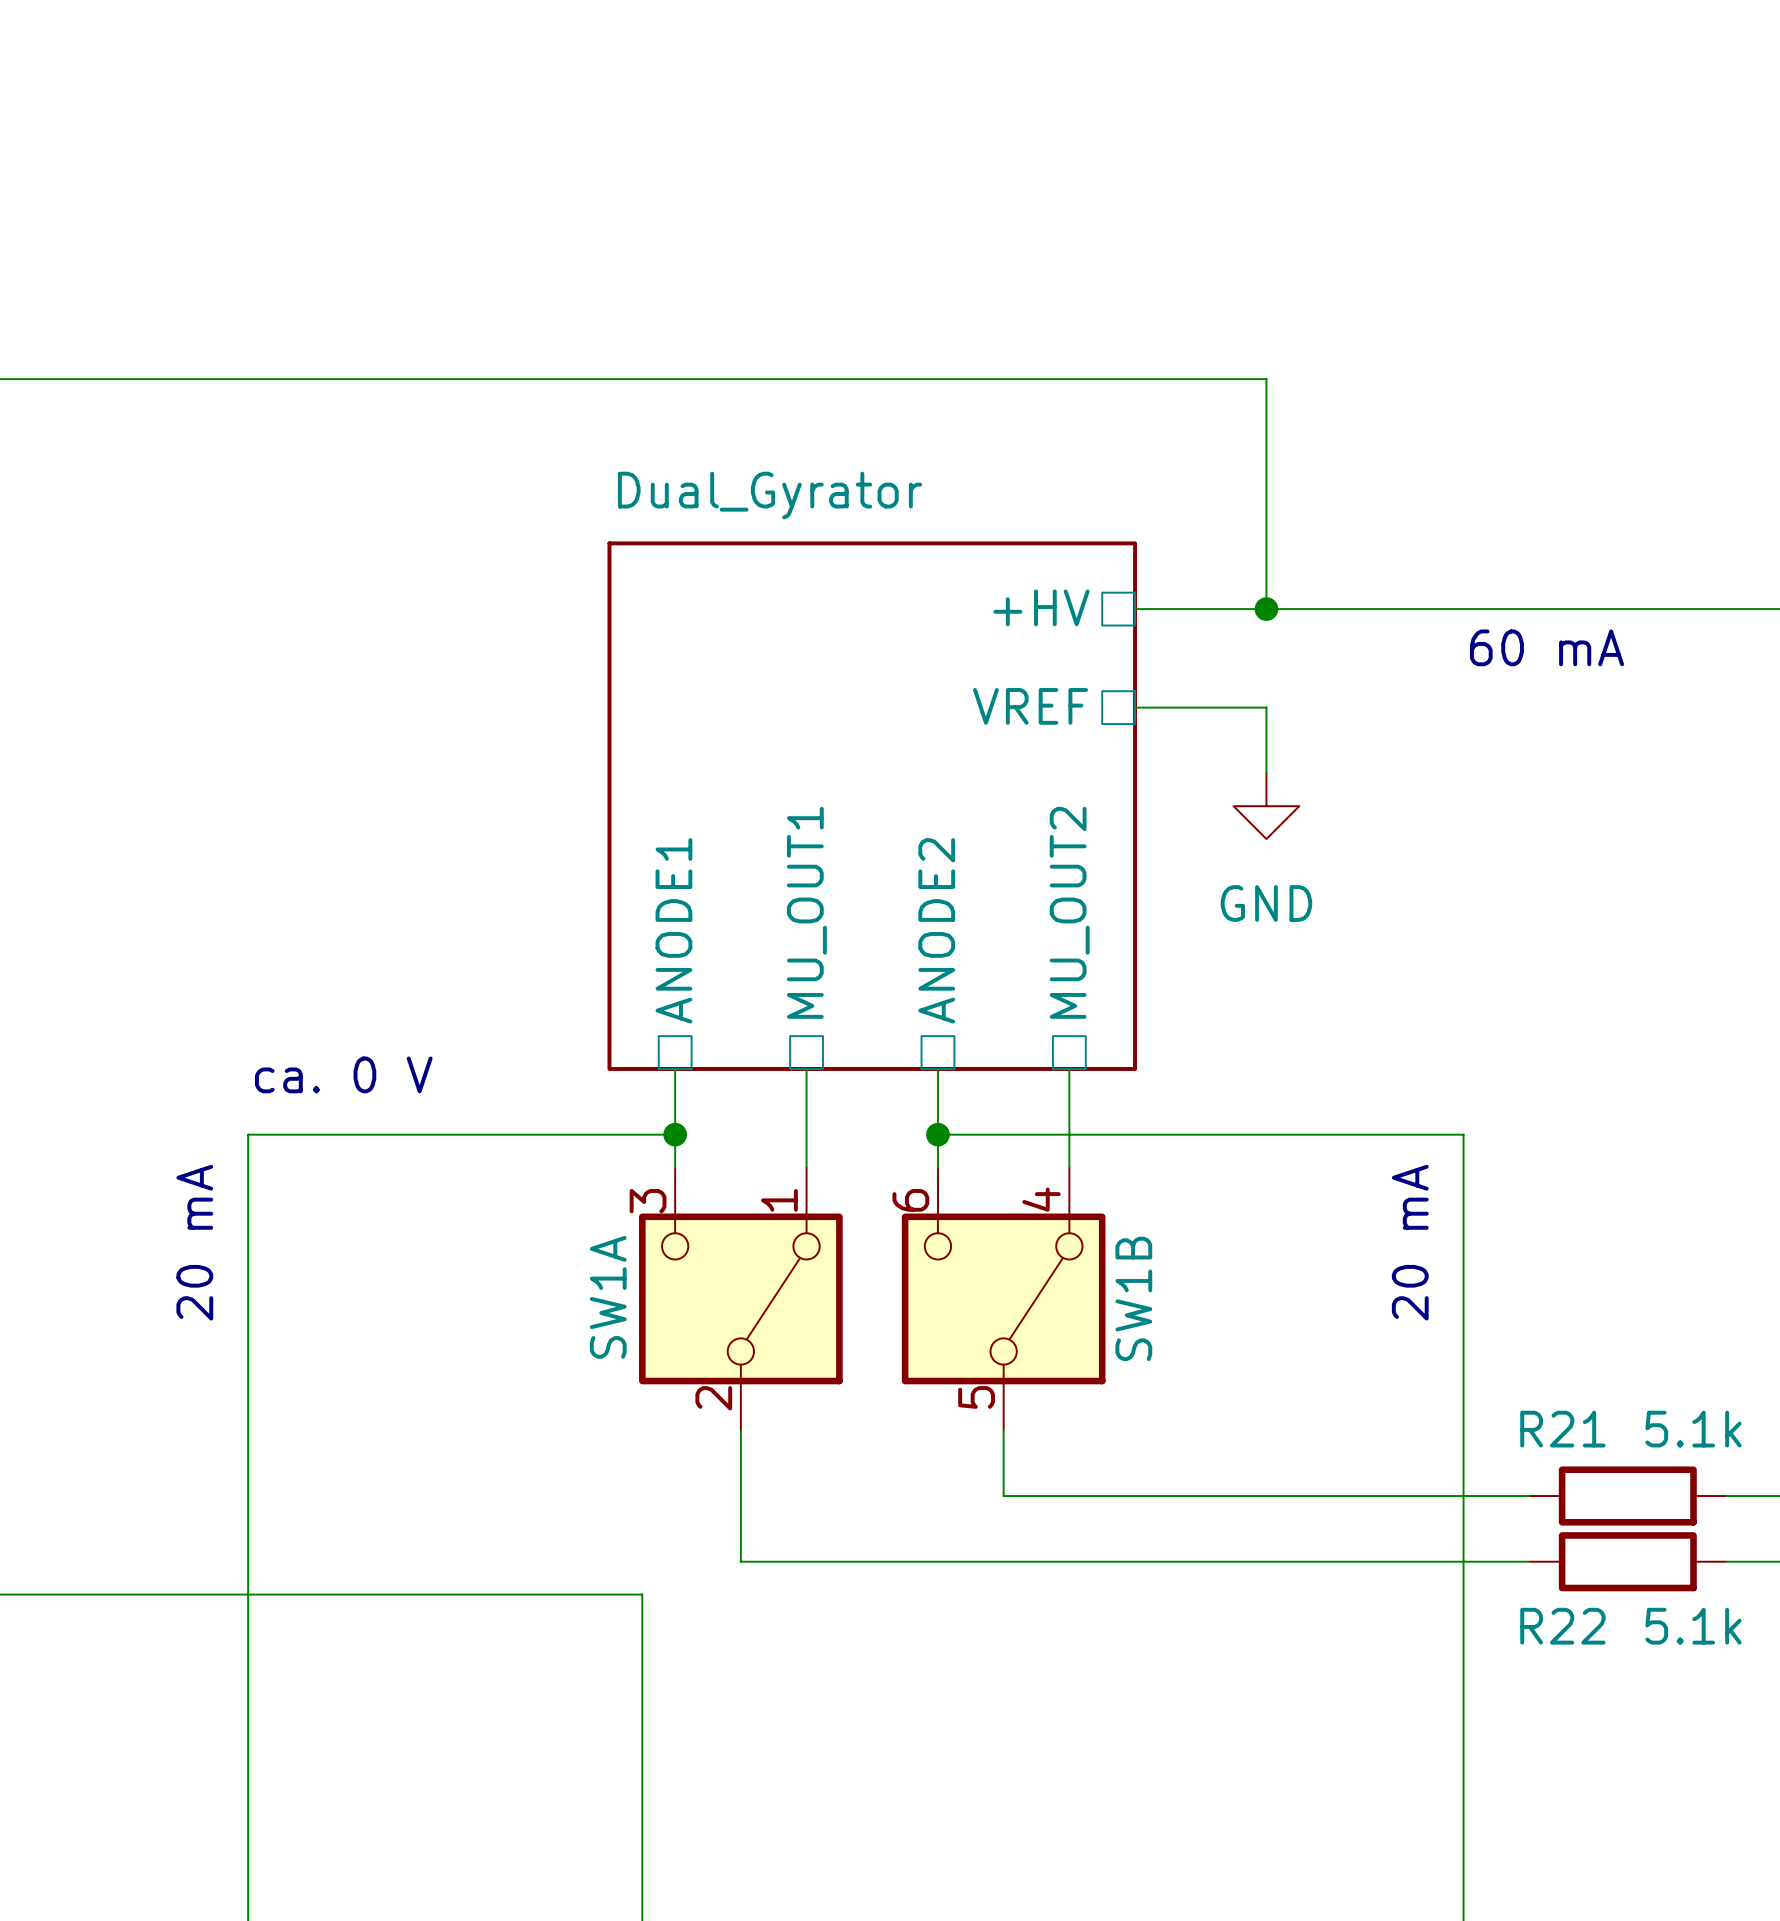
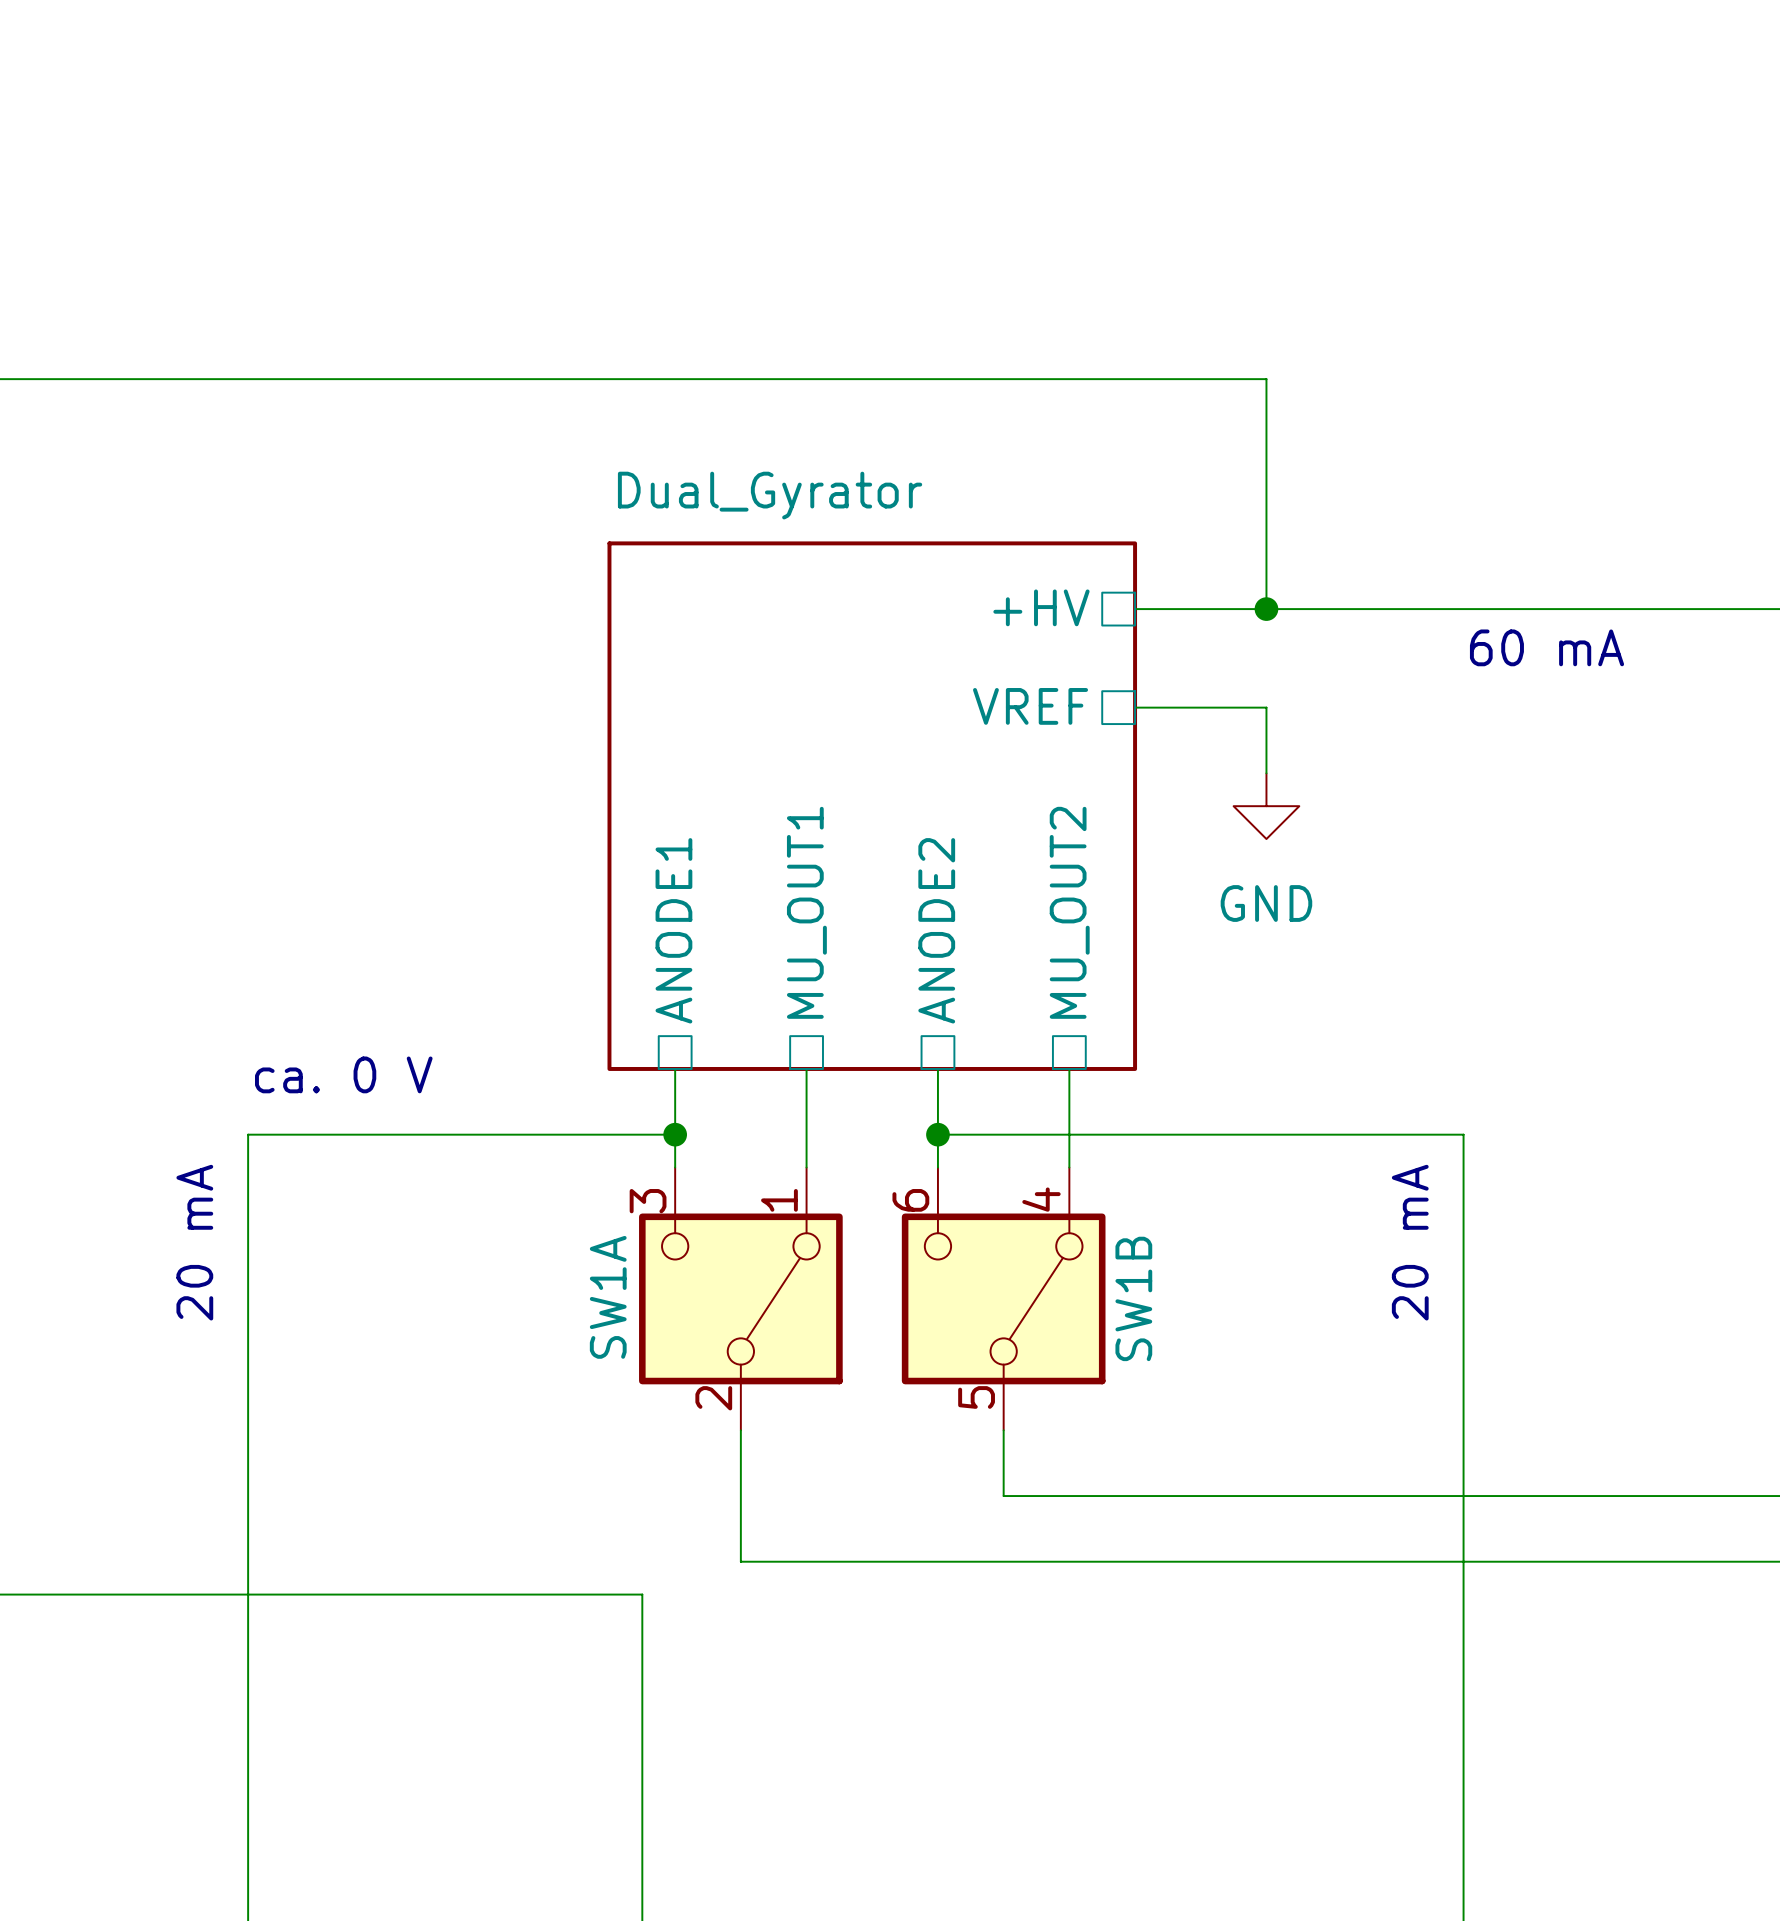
wire: none -> (1529, 1496) (1726, 1496)
R21: 5.1k (1627, 1496) -> none
wire: none -> (1529, 1561) (1726, 1561)
R22: 5.1k (1627, 1561) -> none

